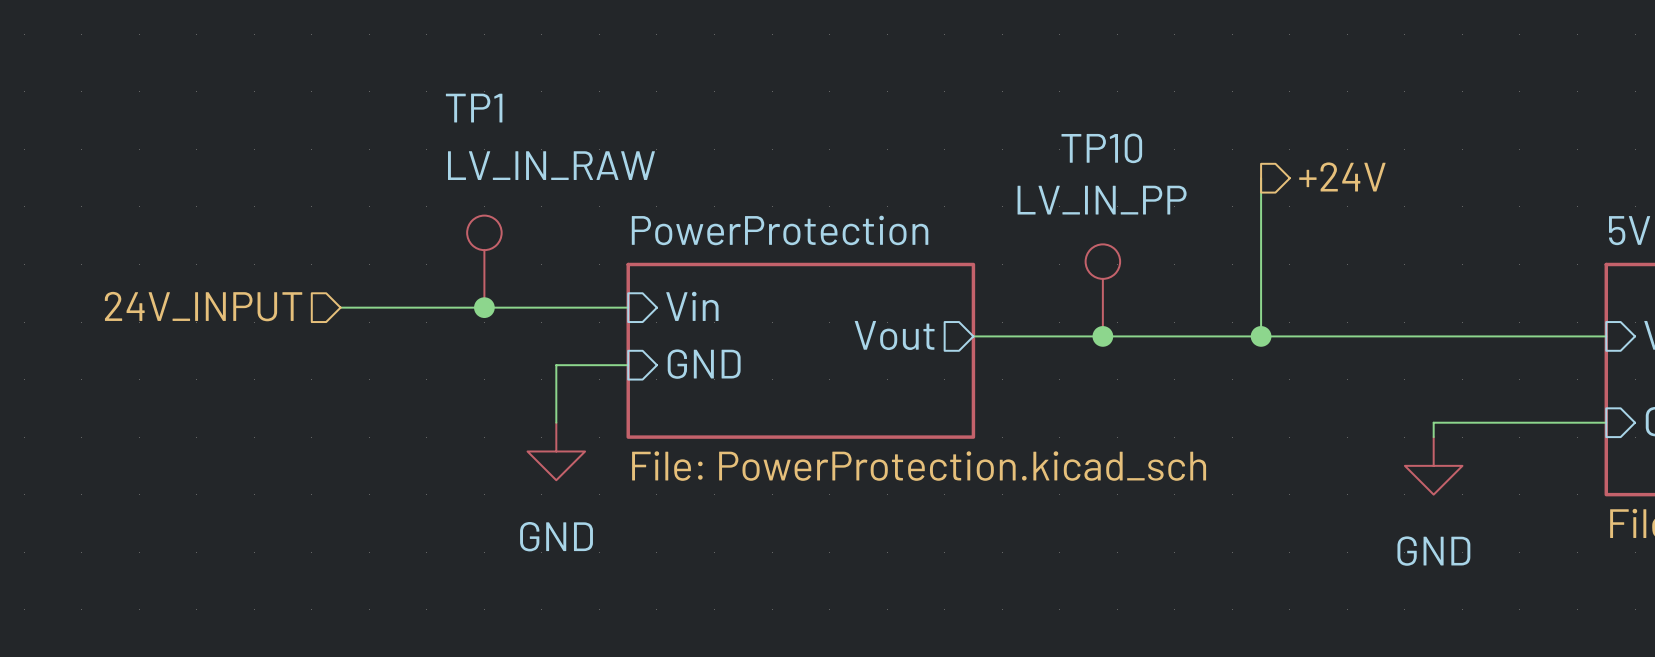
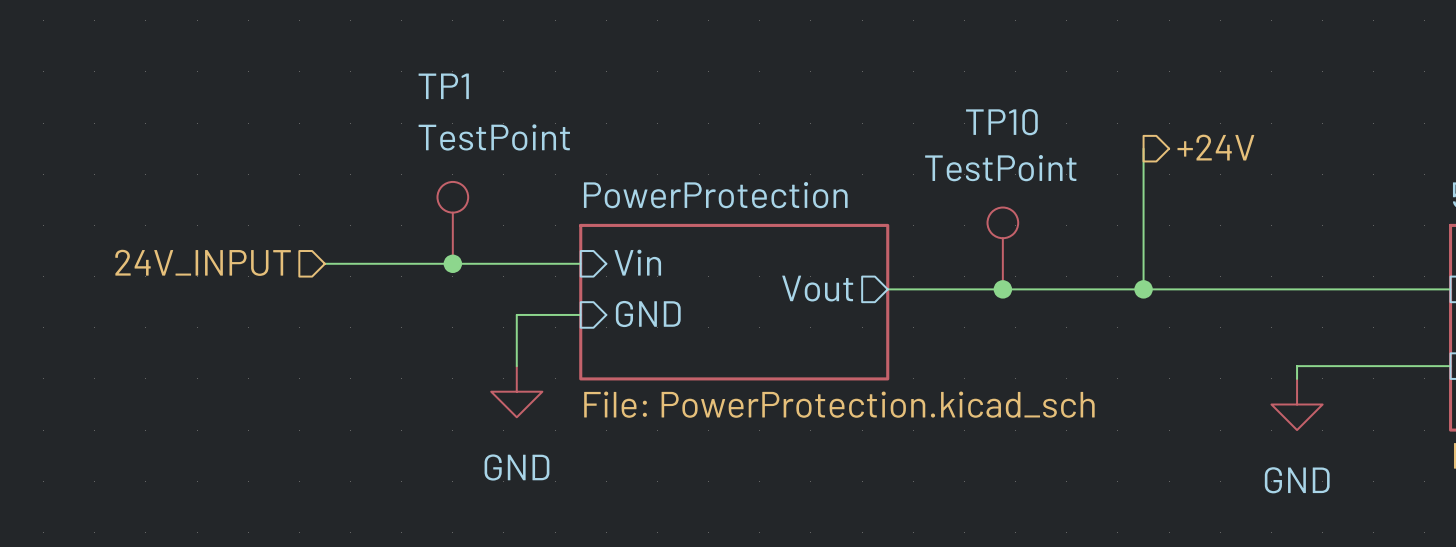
TP1 value: LV_IN_RAW (551, 165) -> TestPoint (494, 137)
TP10 value: LV_IN_PP (1102, 200) -> TestPoint (1000, 168)

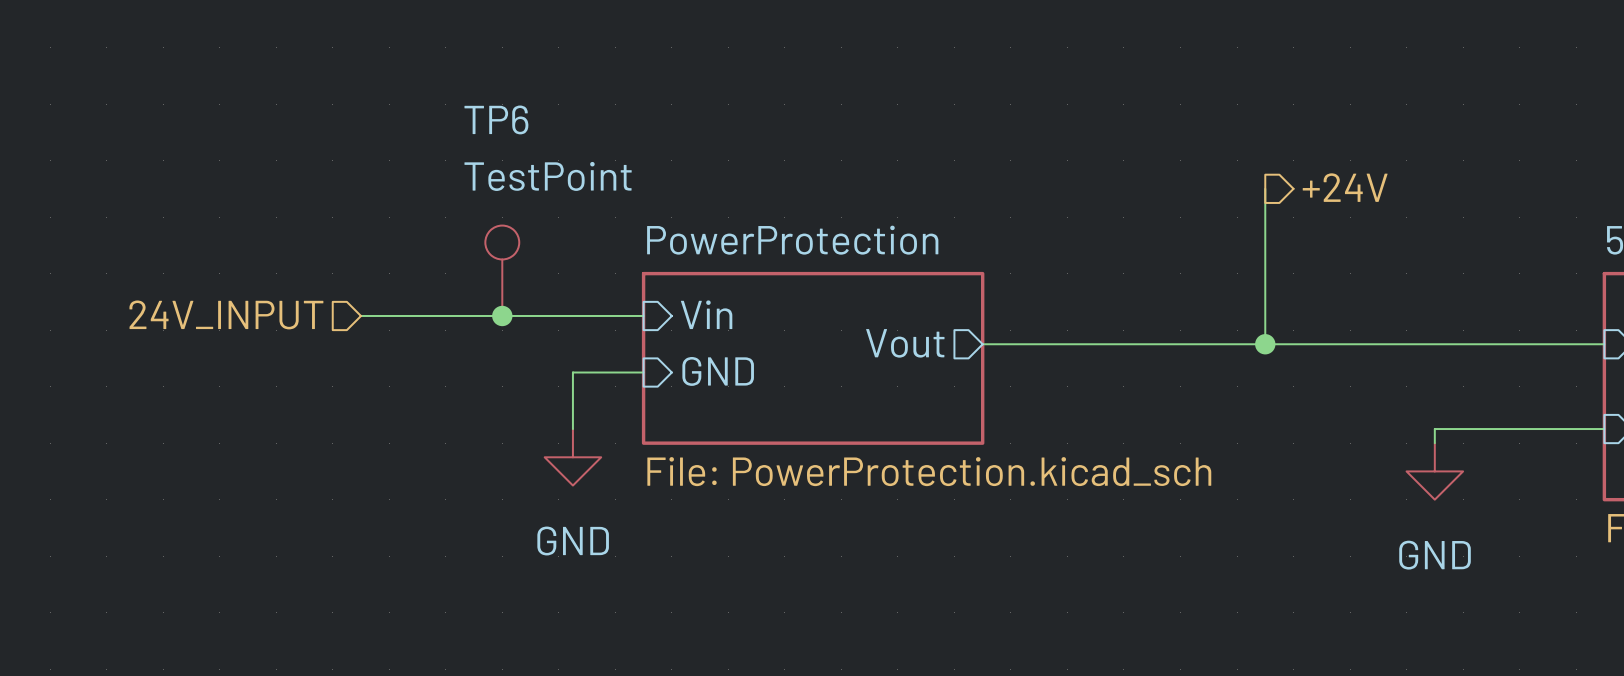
TP1 name: TP1 (443, 86) -> TP6 (496, 119)
TP10: TestPoint (1002, 248) -> none
junction: (1002, 289) -> none

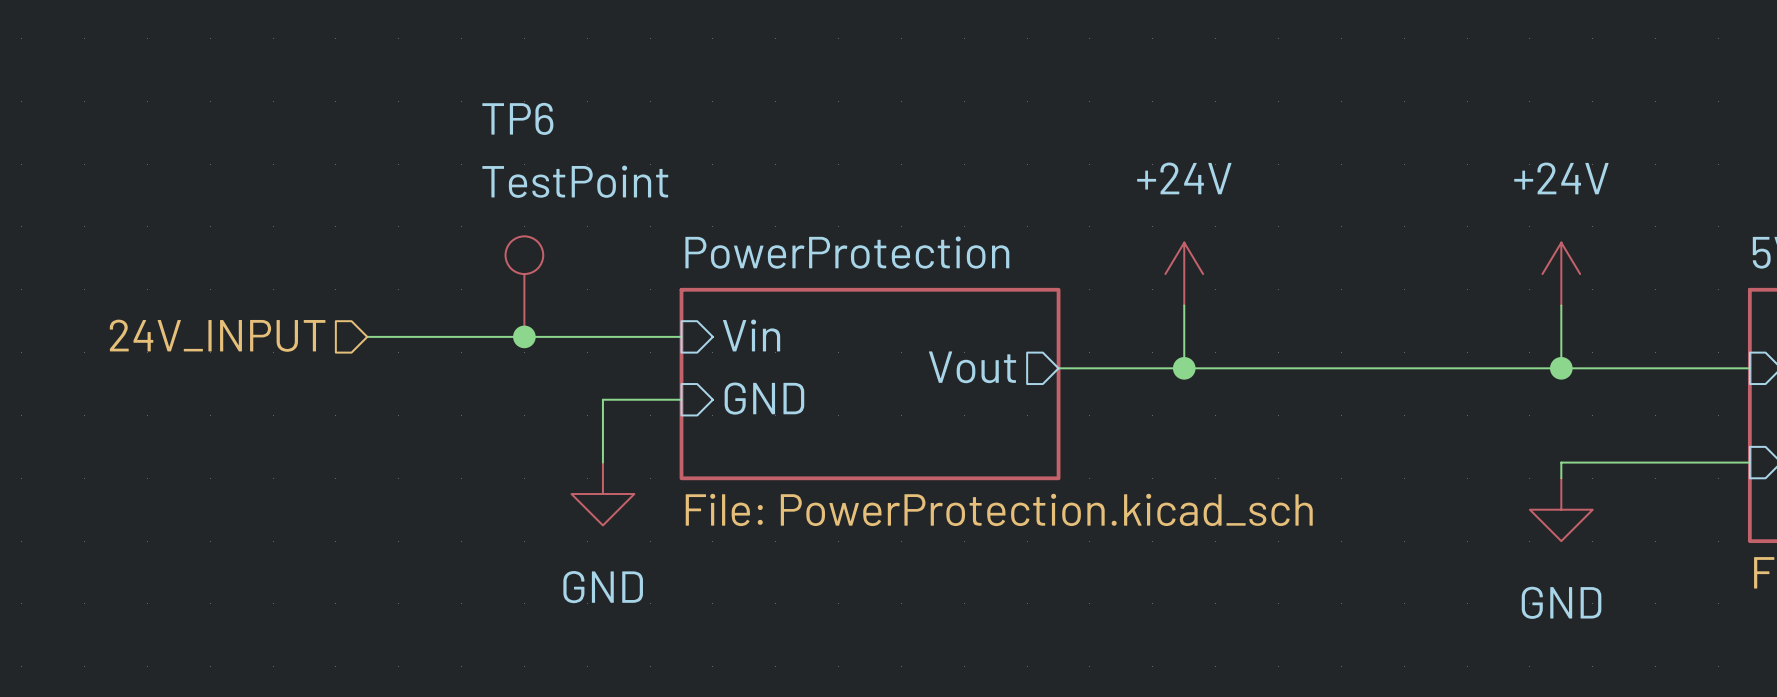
hierarchical label: +24V (1345, 187) -> none
wire: (1265, 188) (1265, 344) -> none
power symbol: none -> +24V (1184, 274)
power symbol: none -> +24V (1561, 274)
wire: none -> (1184, 305) (1184, 368)
wire: none -> (1561, 305) (1561, 368)
junction: none -> (1184, 368)
junction: (1265, 344) -> none
junction: none -> (1561, 368)

